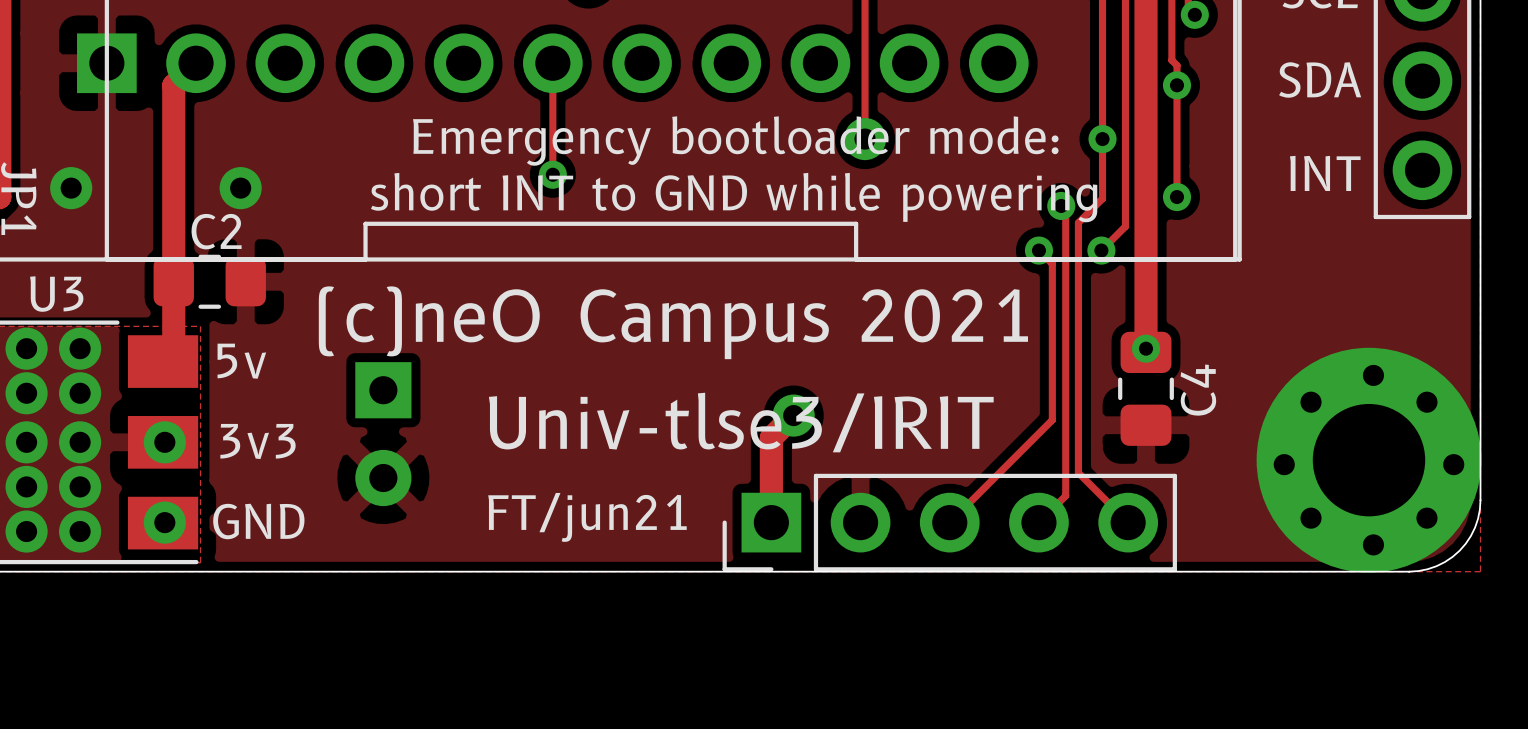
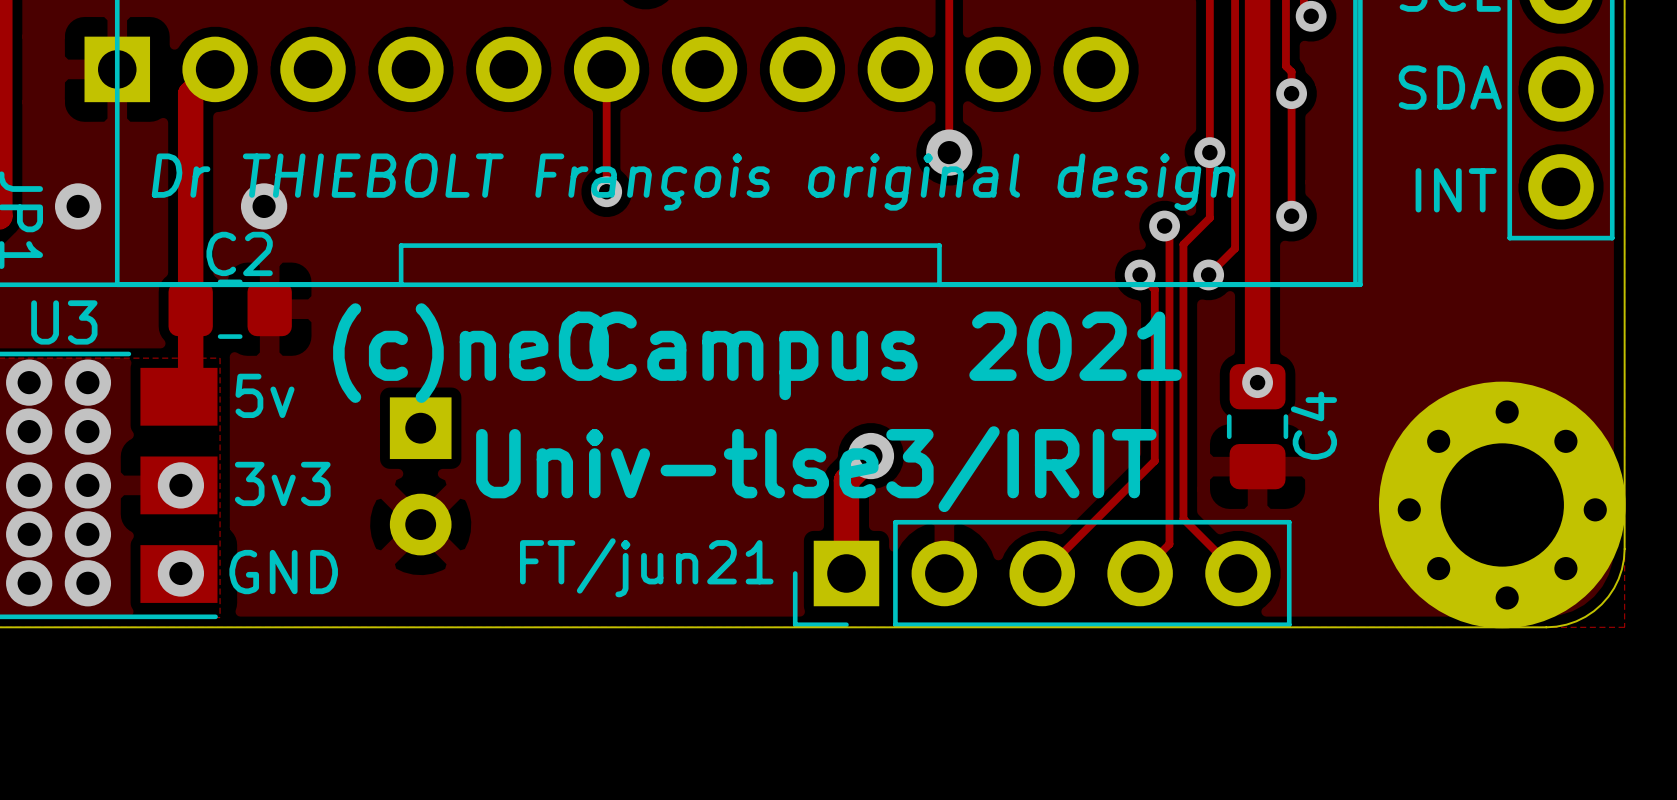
text: Emergency bootloader mode: (735, 141) -> none
text: none -> Dr THIEBOLT François original design (693, 182)
text: short INT to GND while powering (734, 197) -> none

